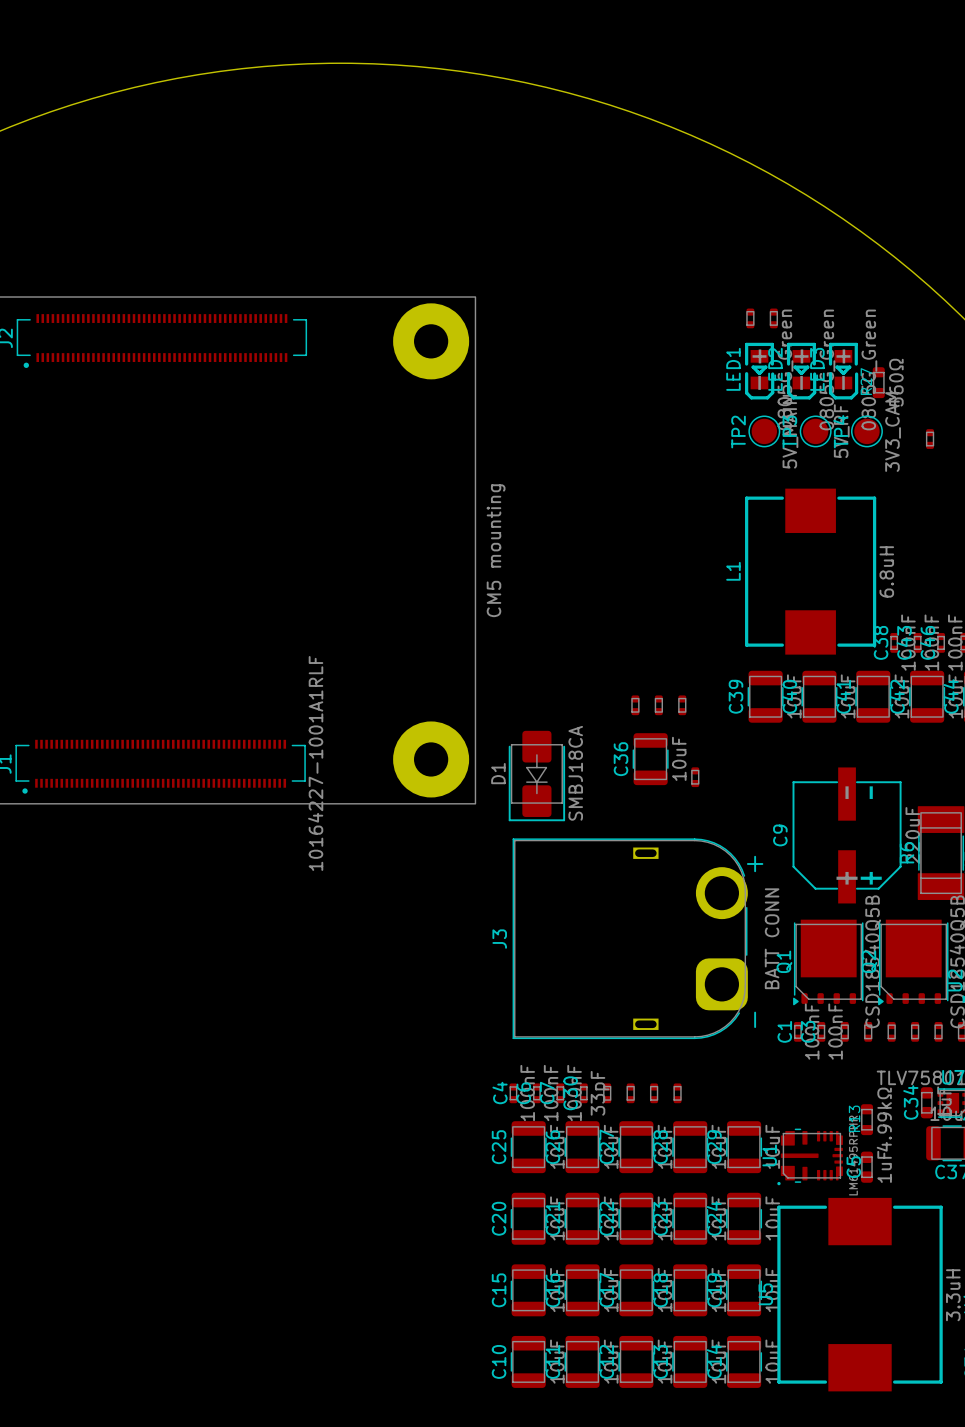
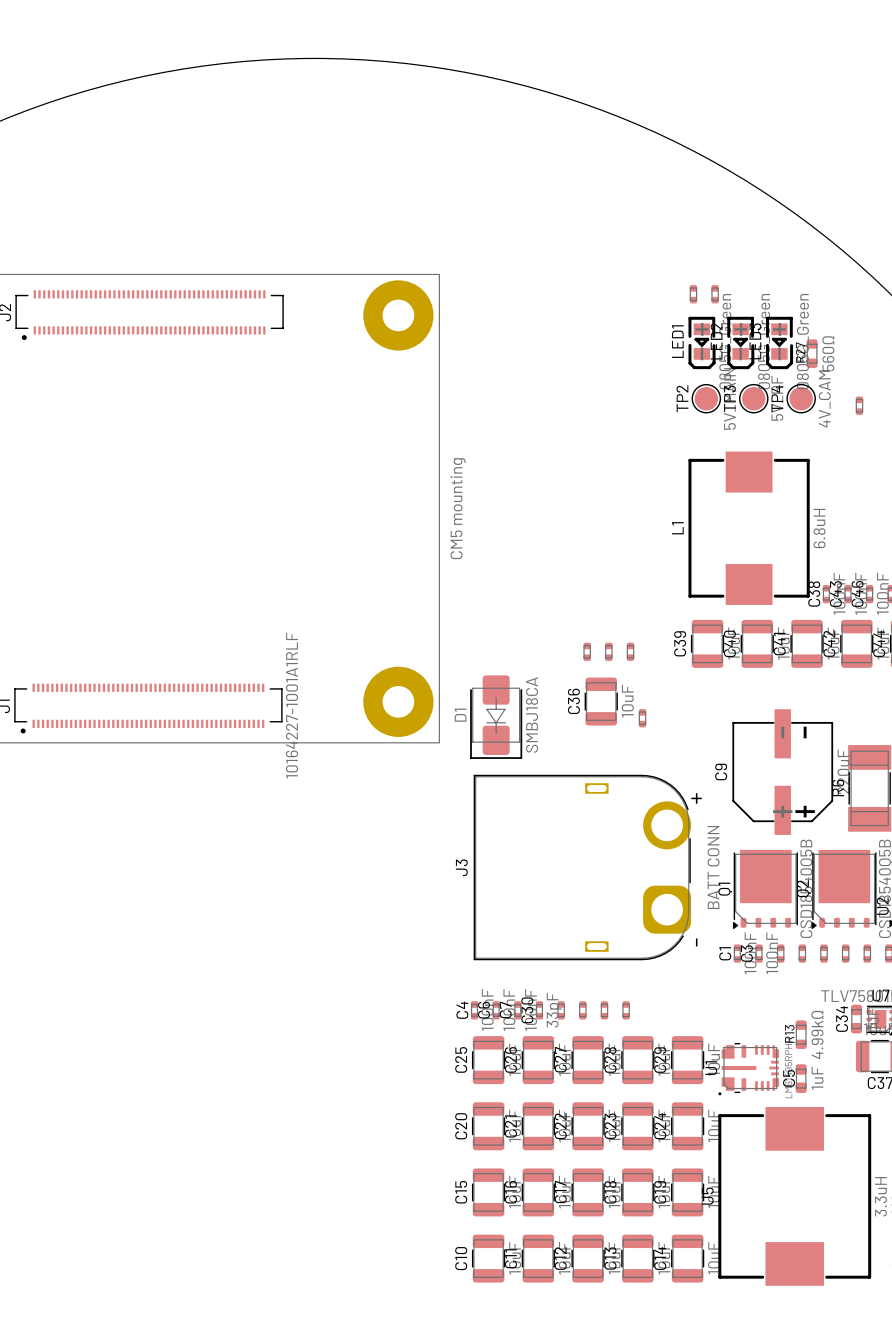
TP4 value: 3V3_CAM (893, 432) -> 4V_CAM (824, 399)

